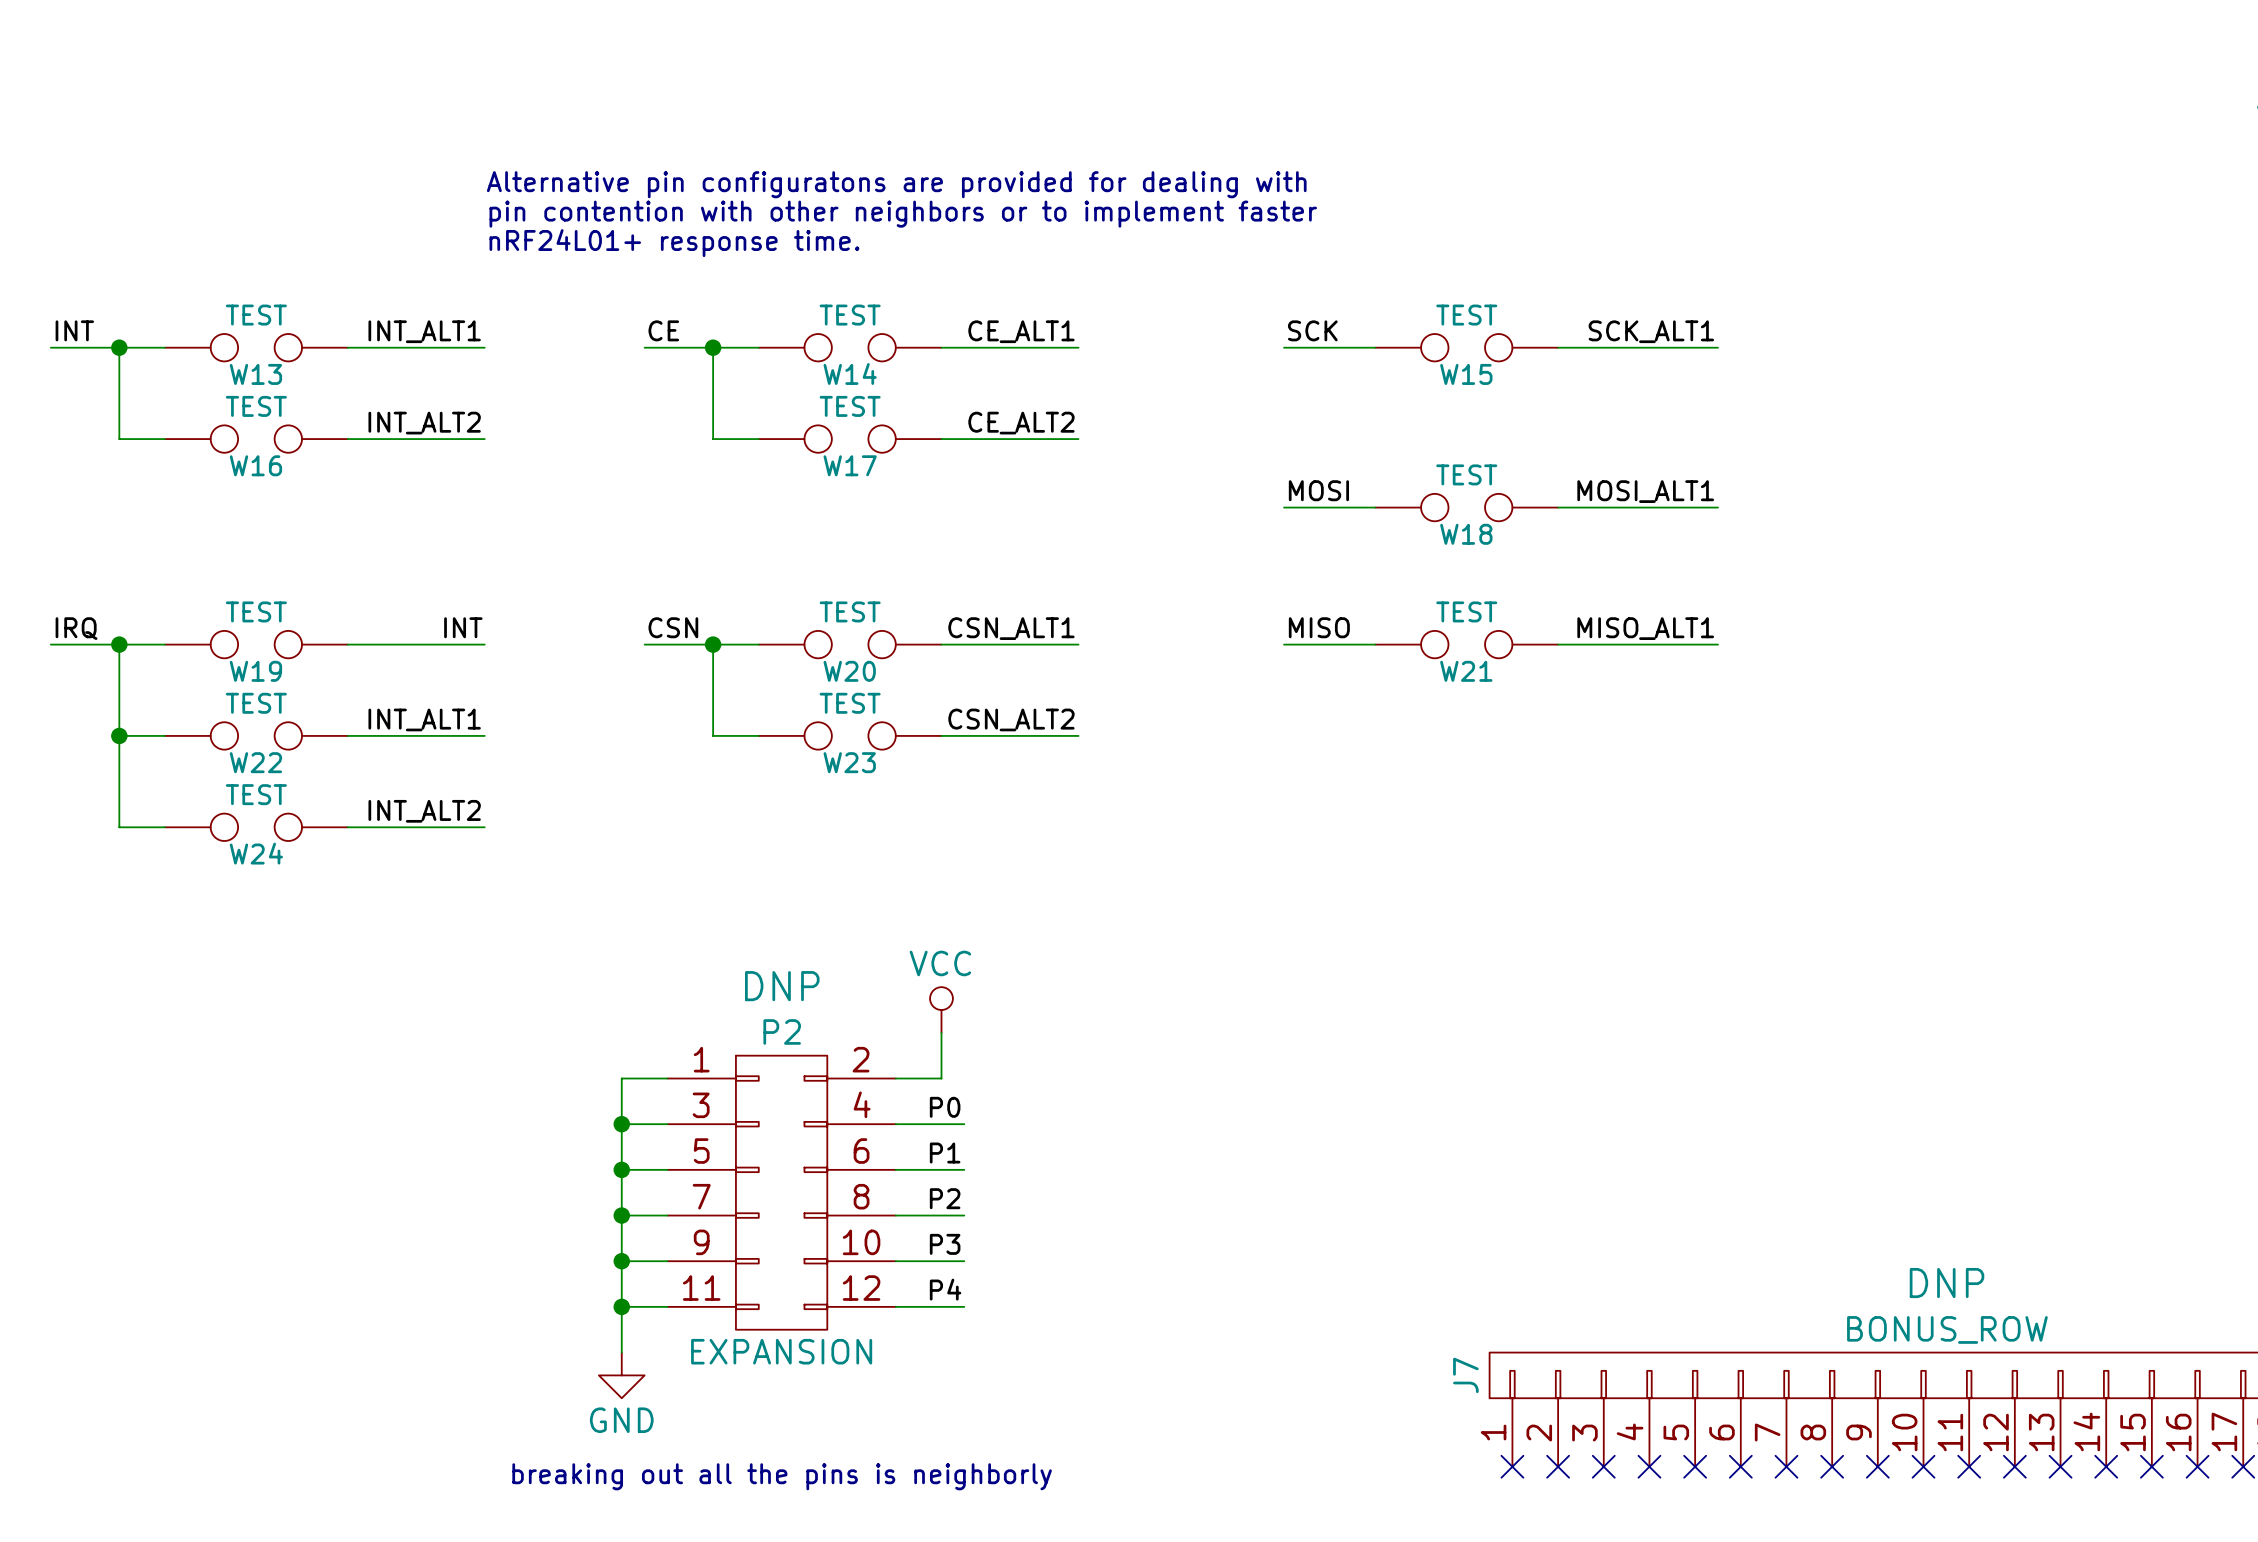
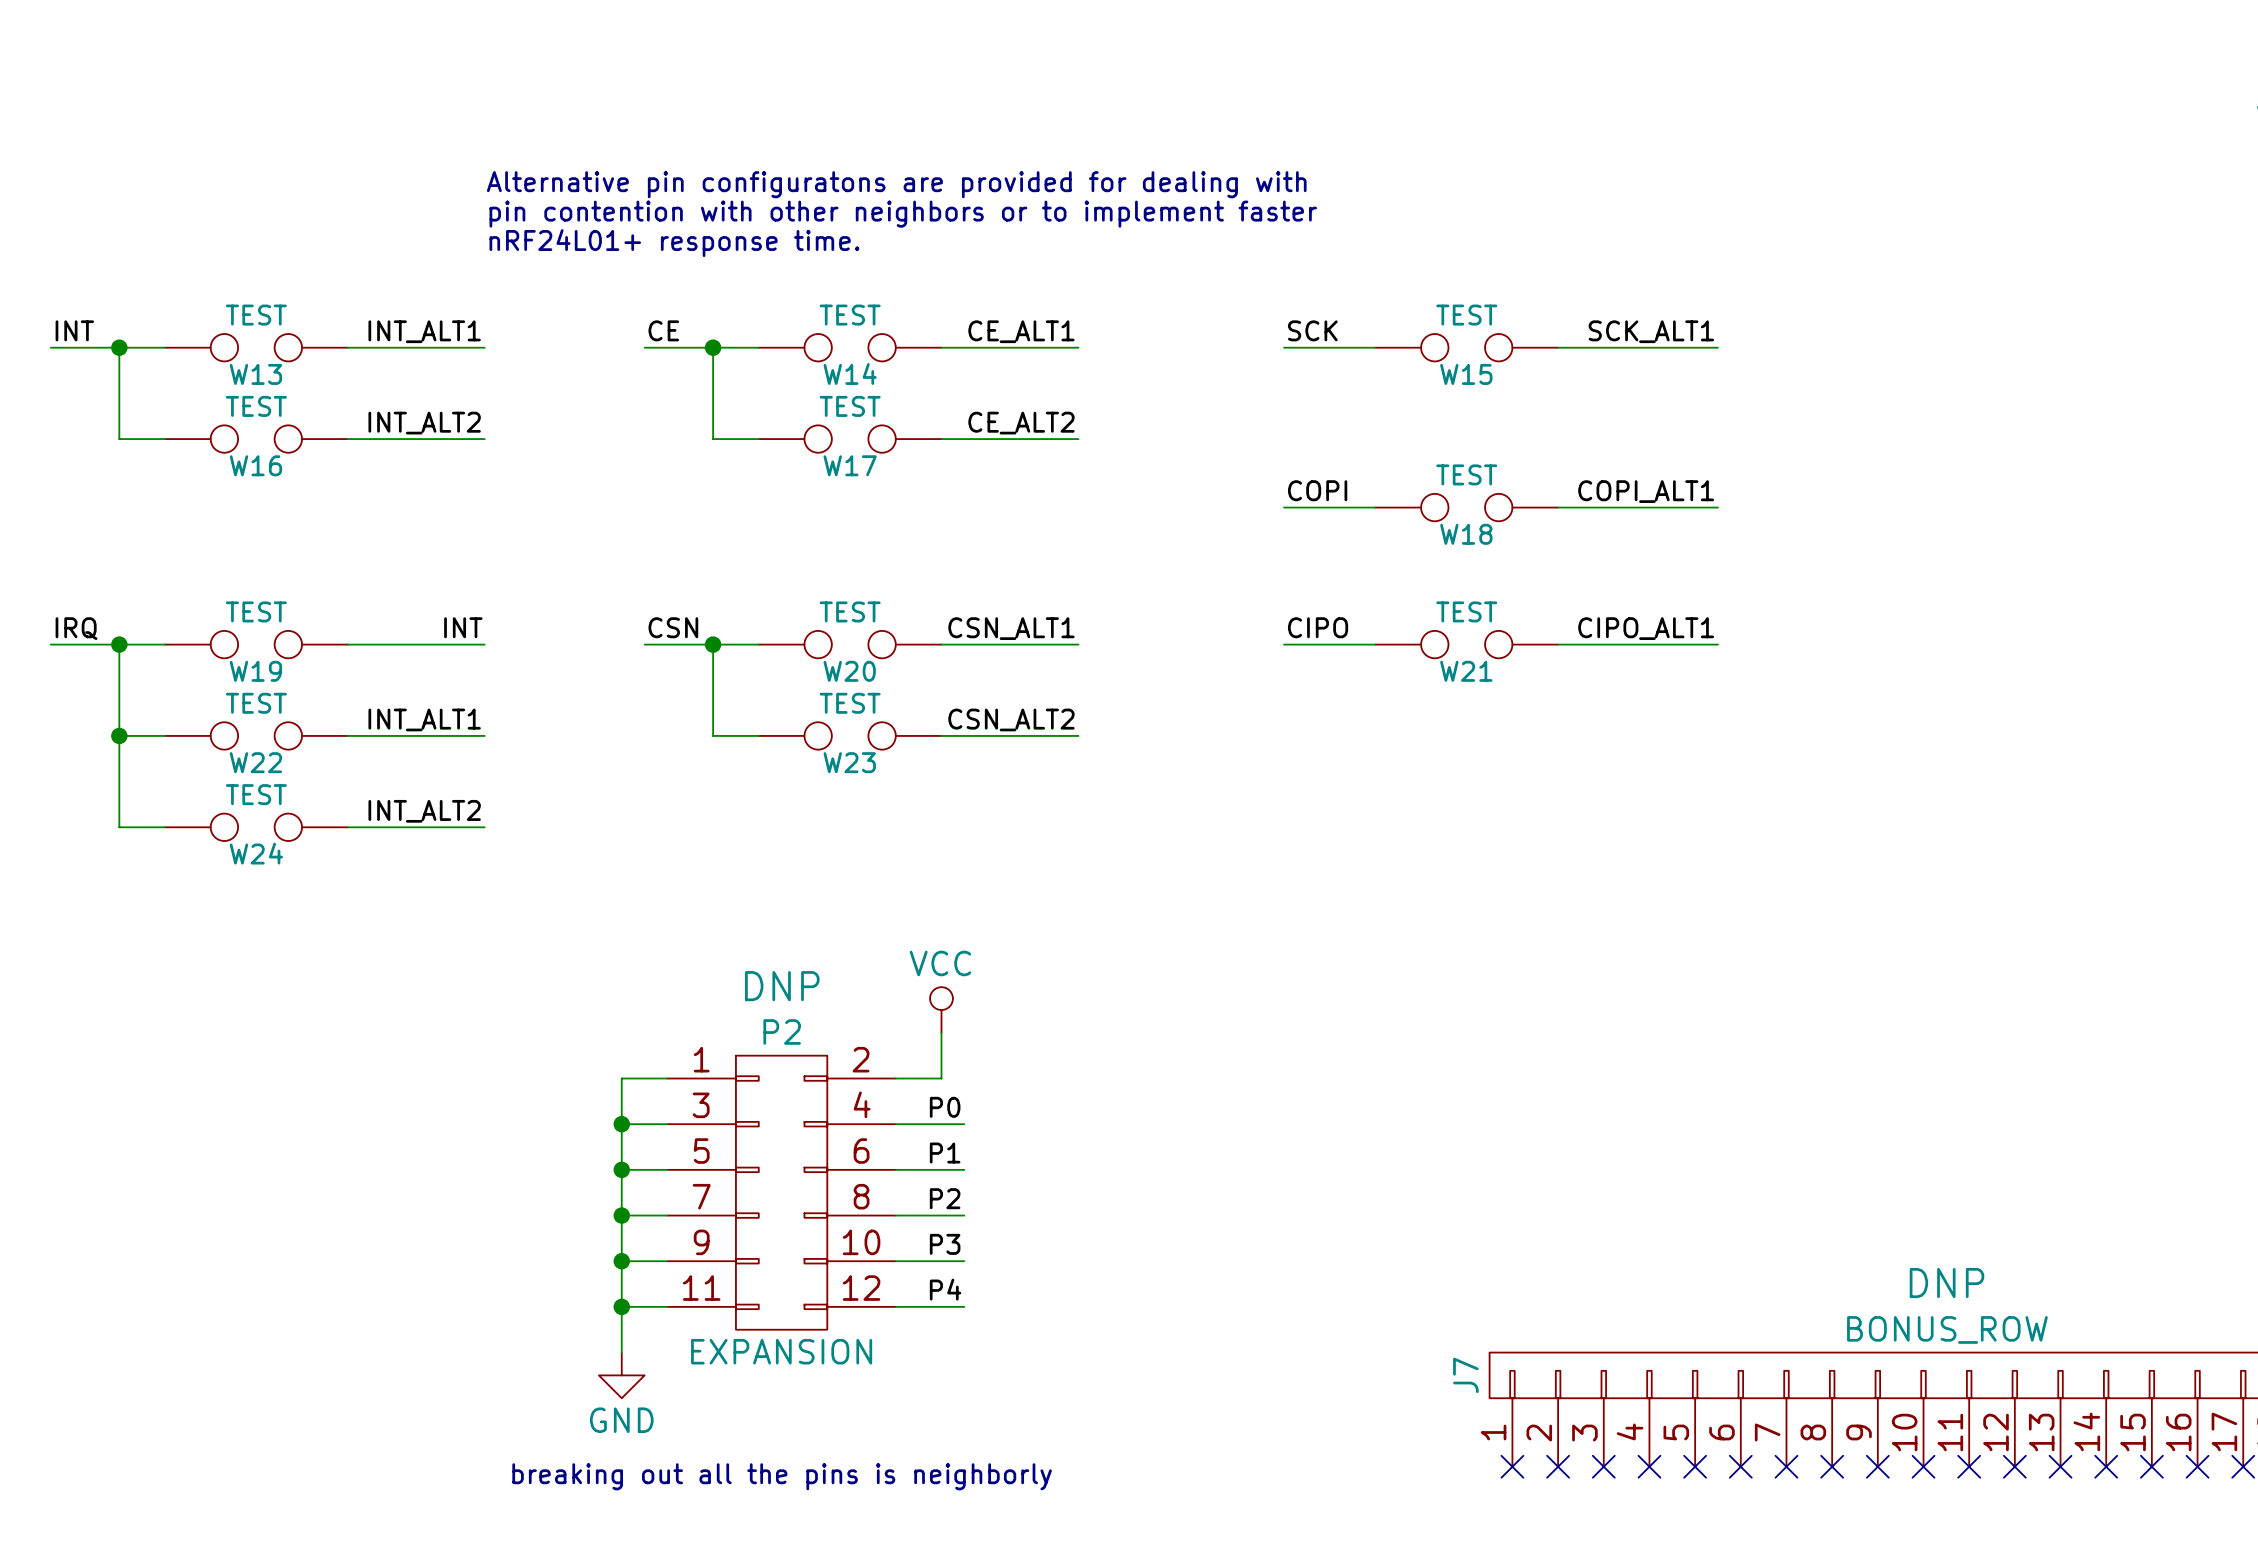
label: MOSI (1318, 490) -> COPI (1317, 490)
label: MOSI_ALT1 (1645, 491) -> COPI_ALT1 (1646, 491)
label: MISO (1319, 627) -> CIPO (1318, 627)
label: MISO_ALT1 (1645, 628) -> CIPO_ALT1 (1646, 628)

